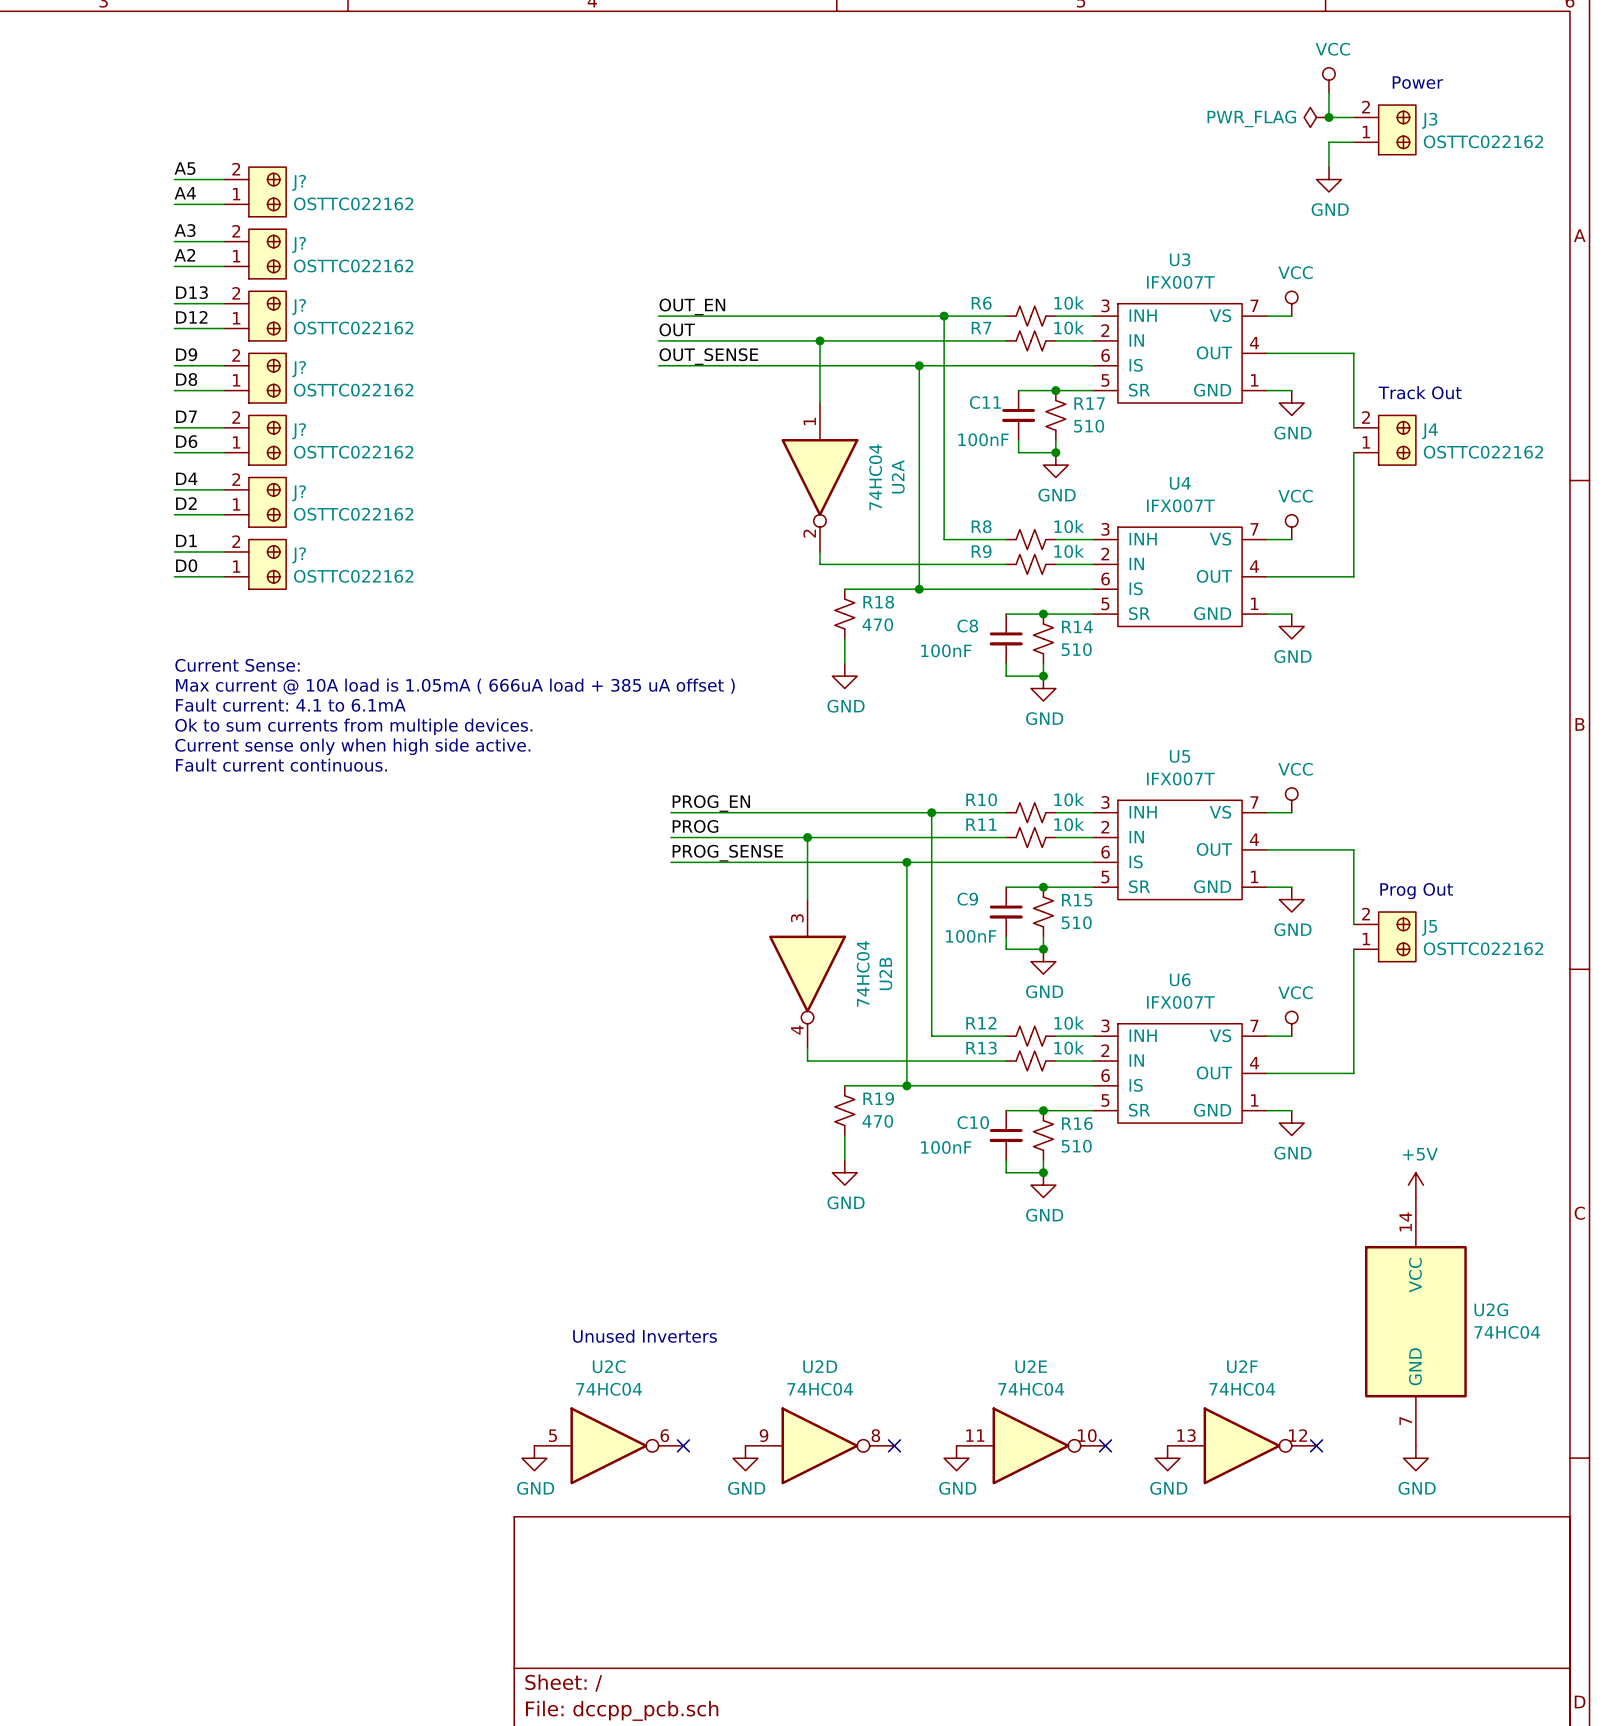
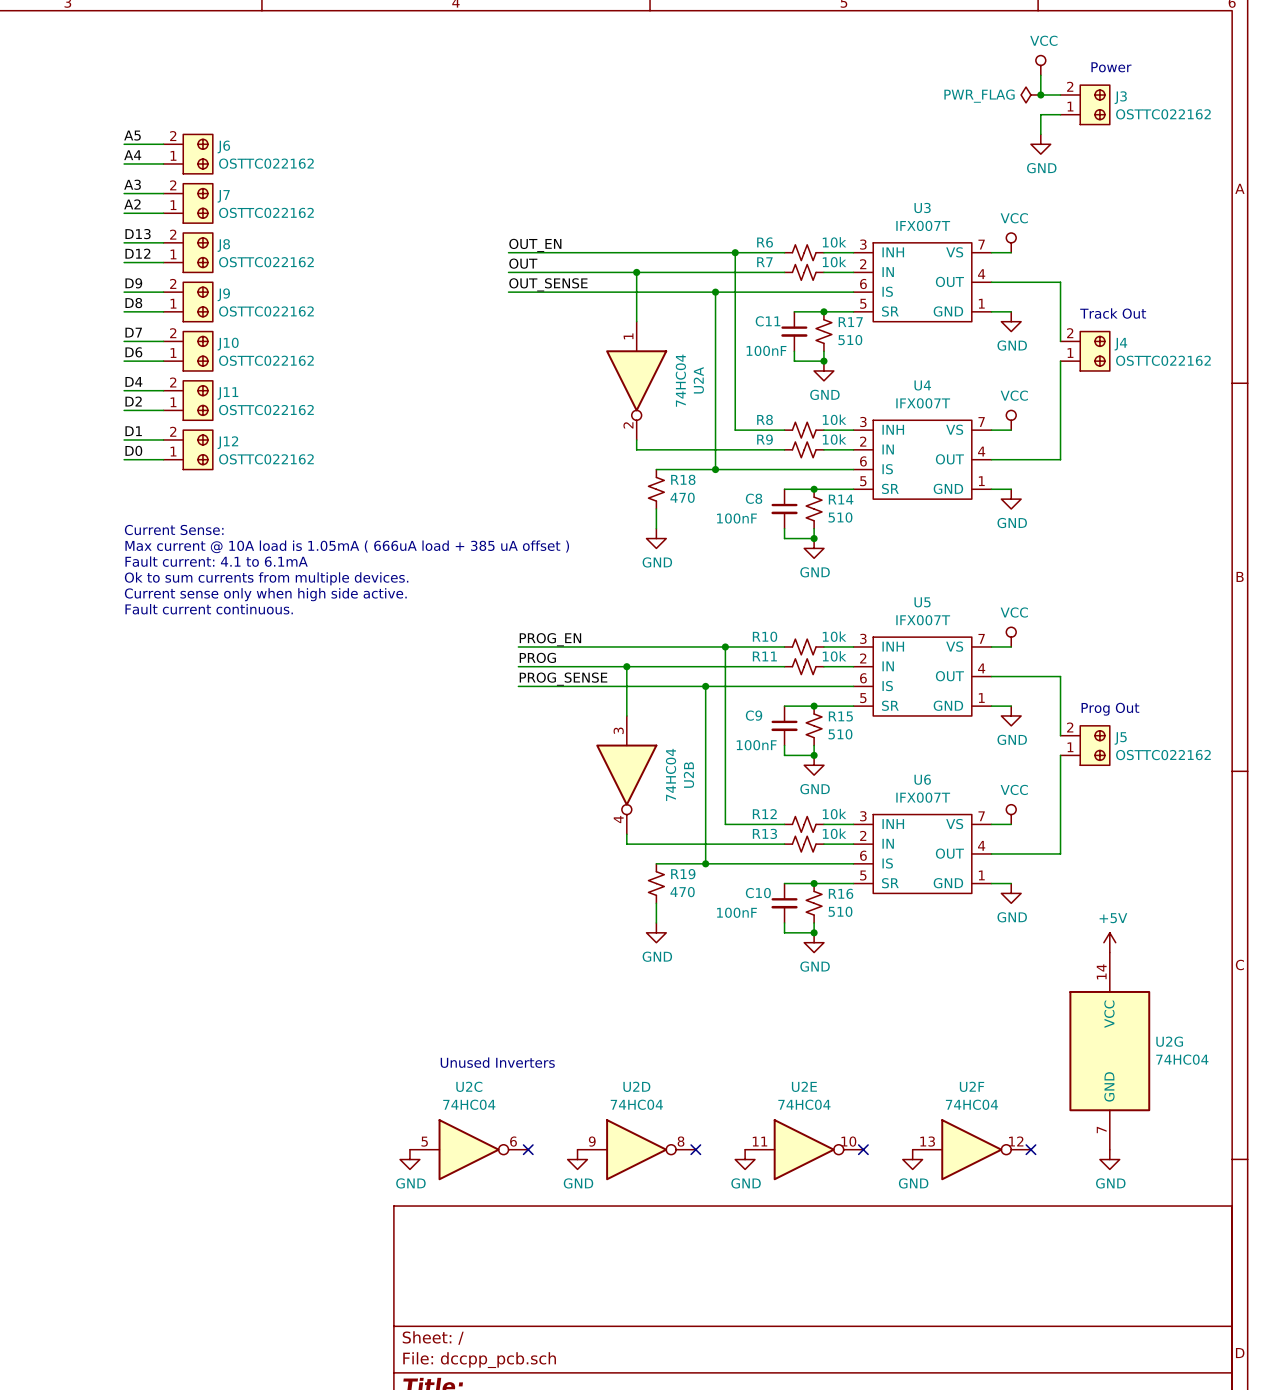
J? name: J? (299, 182) -> J6 (223, 146)
J? name: J? (299, 244) -> J7 (223, 196)
J? name: J? (299, 307) -> J8 (223, 245)
J? name: J? (299, 369) -> J9 (223, 294)
J? name: J? (299, 431) -> J10 (228, 344)
J? name: J? (299, 493) -> J11 (227, 393)
J? name: J? (299, 555) -> J12 (227, 442)

